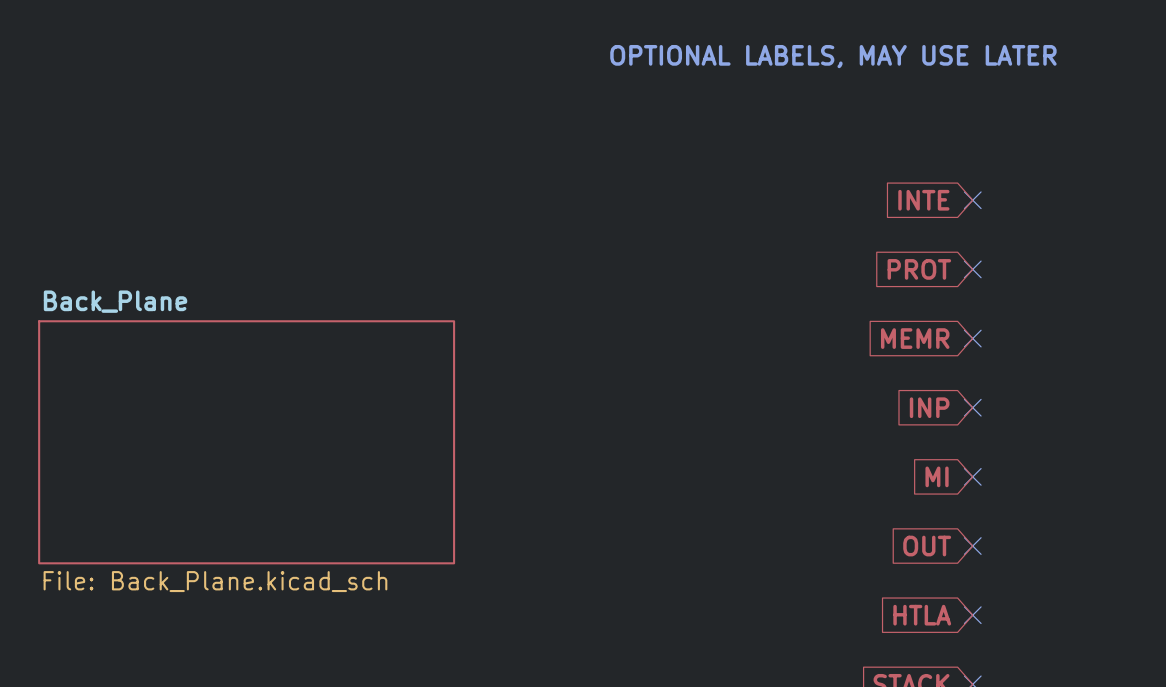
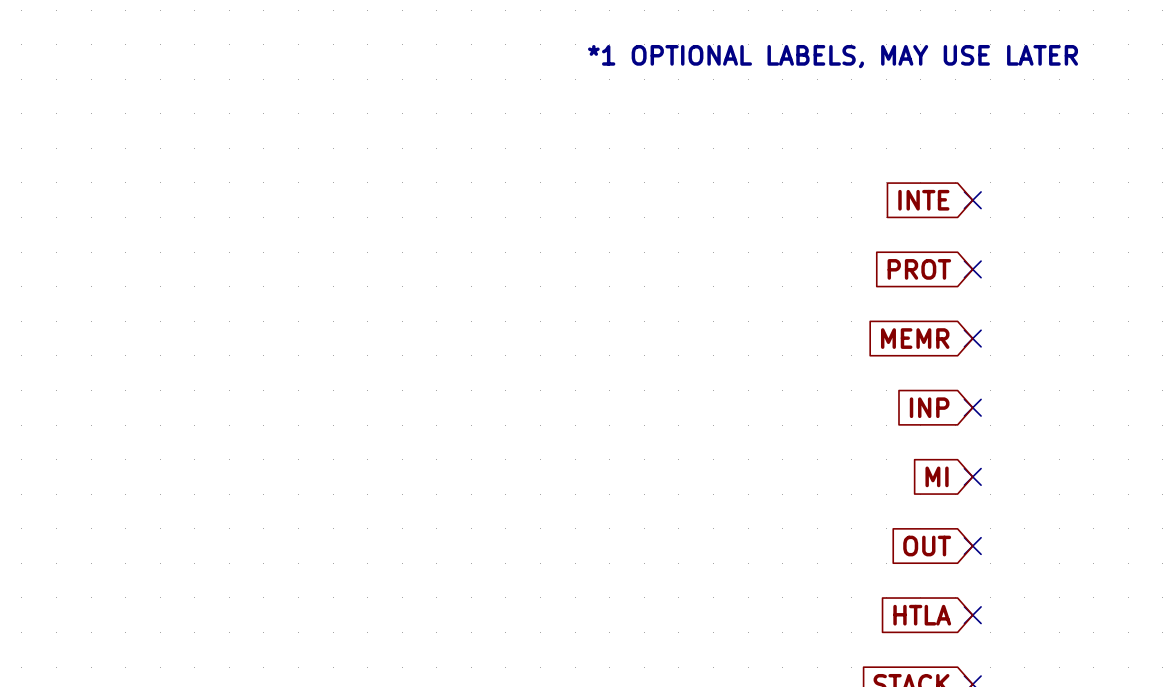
text: OPTIONAL LABELS, MAY USE LATER (833, 56) -> *1 OPTIONAL LABELS, MAY USE LATER (833, 56)
sheet Back_Plane: File: Back_Plane.kicad_sch (246, 442) -> none

